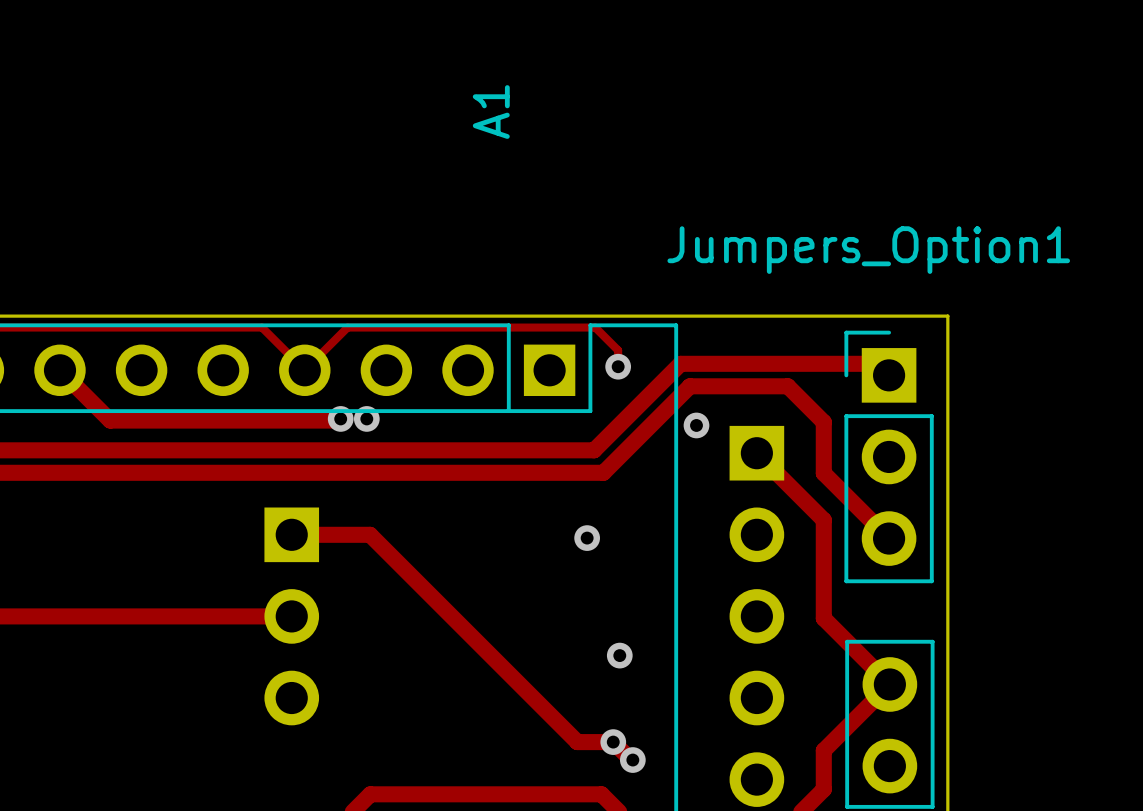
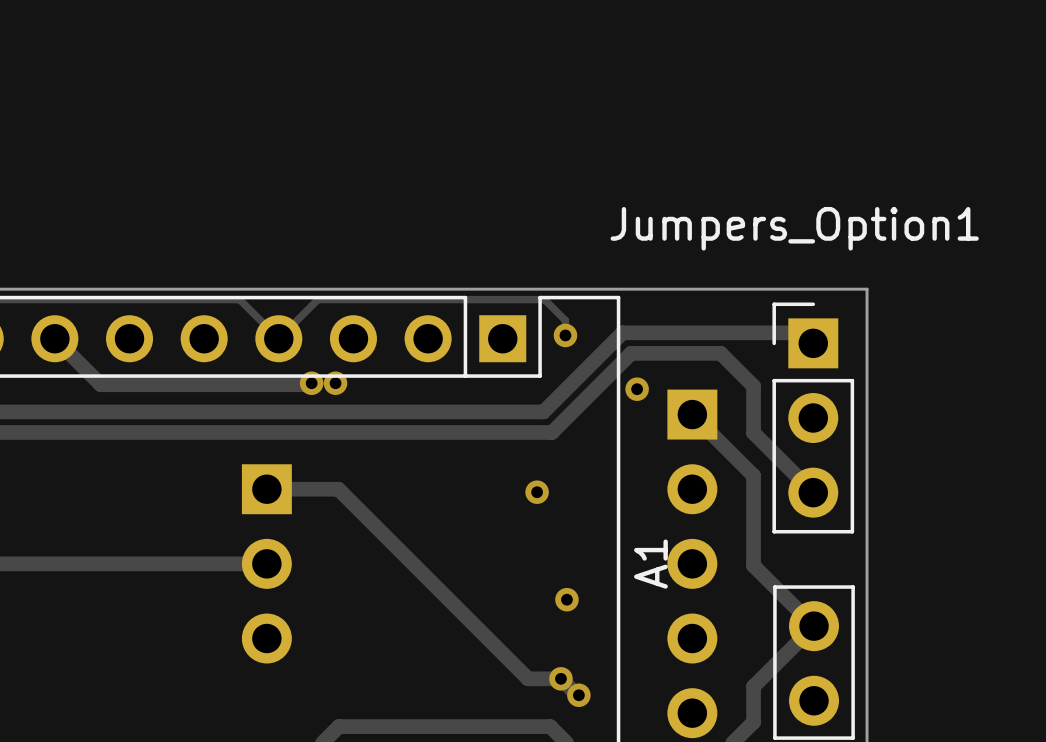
A1 name position: A1 (491, 112) -> A1 (650, 564)

